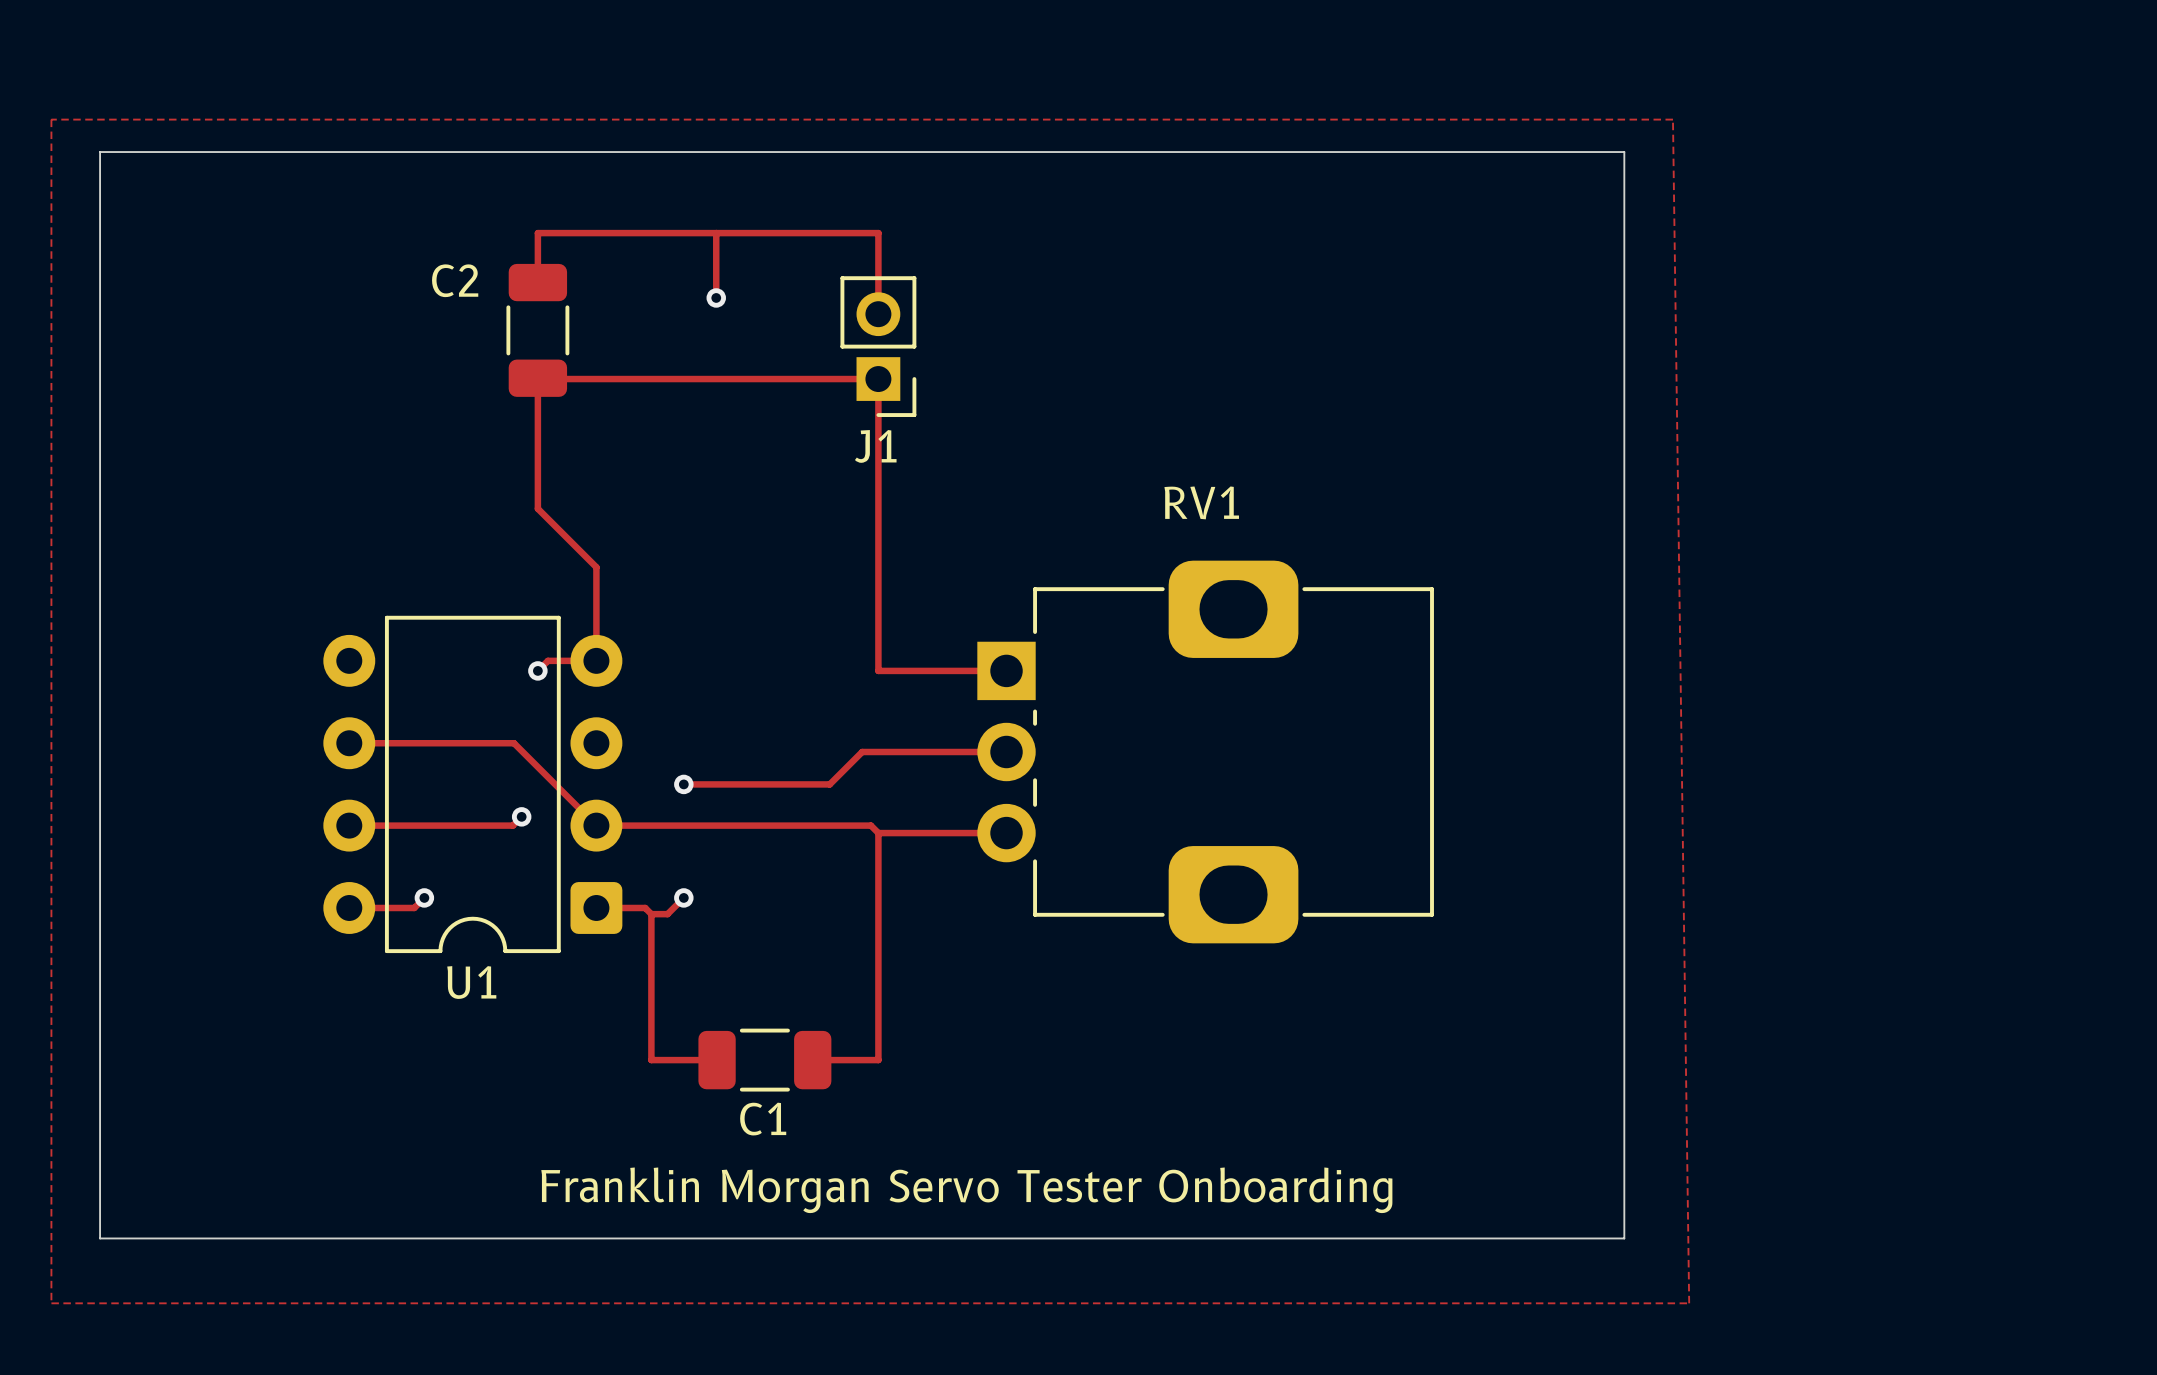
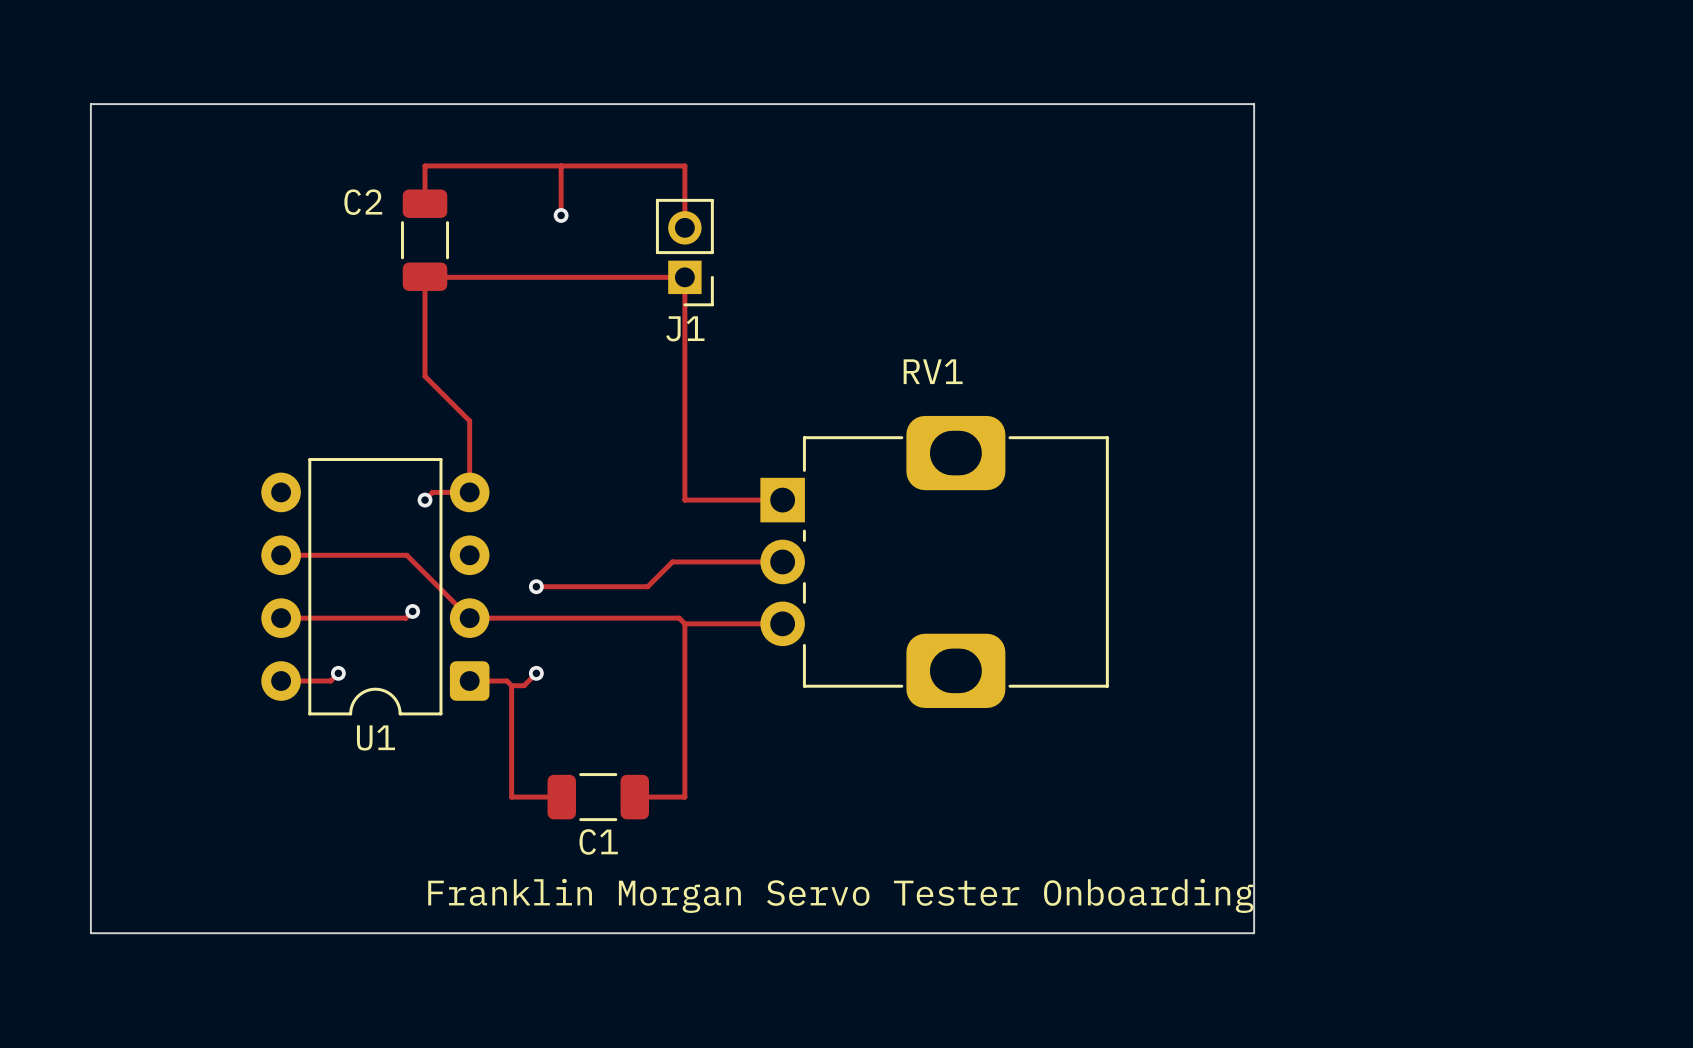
zone outline: (51, 119) (51, 1303) (1689, 1303) (1672, 119) (51, 119) -> none

